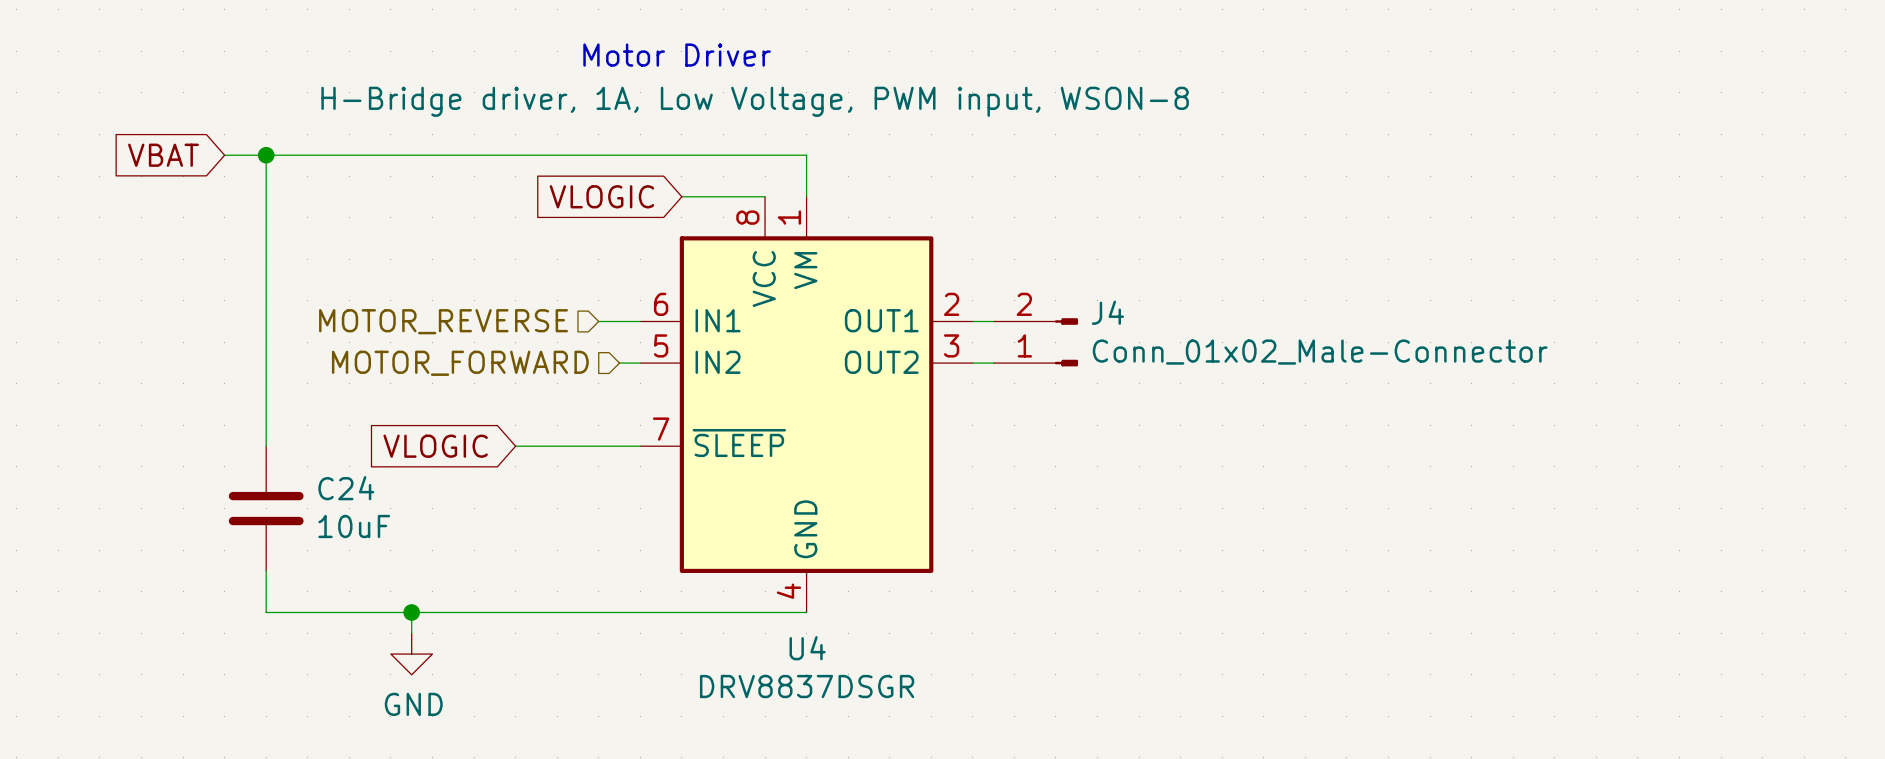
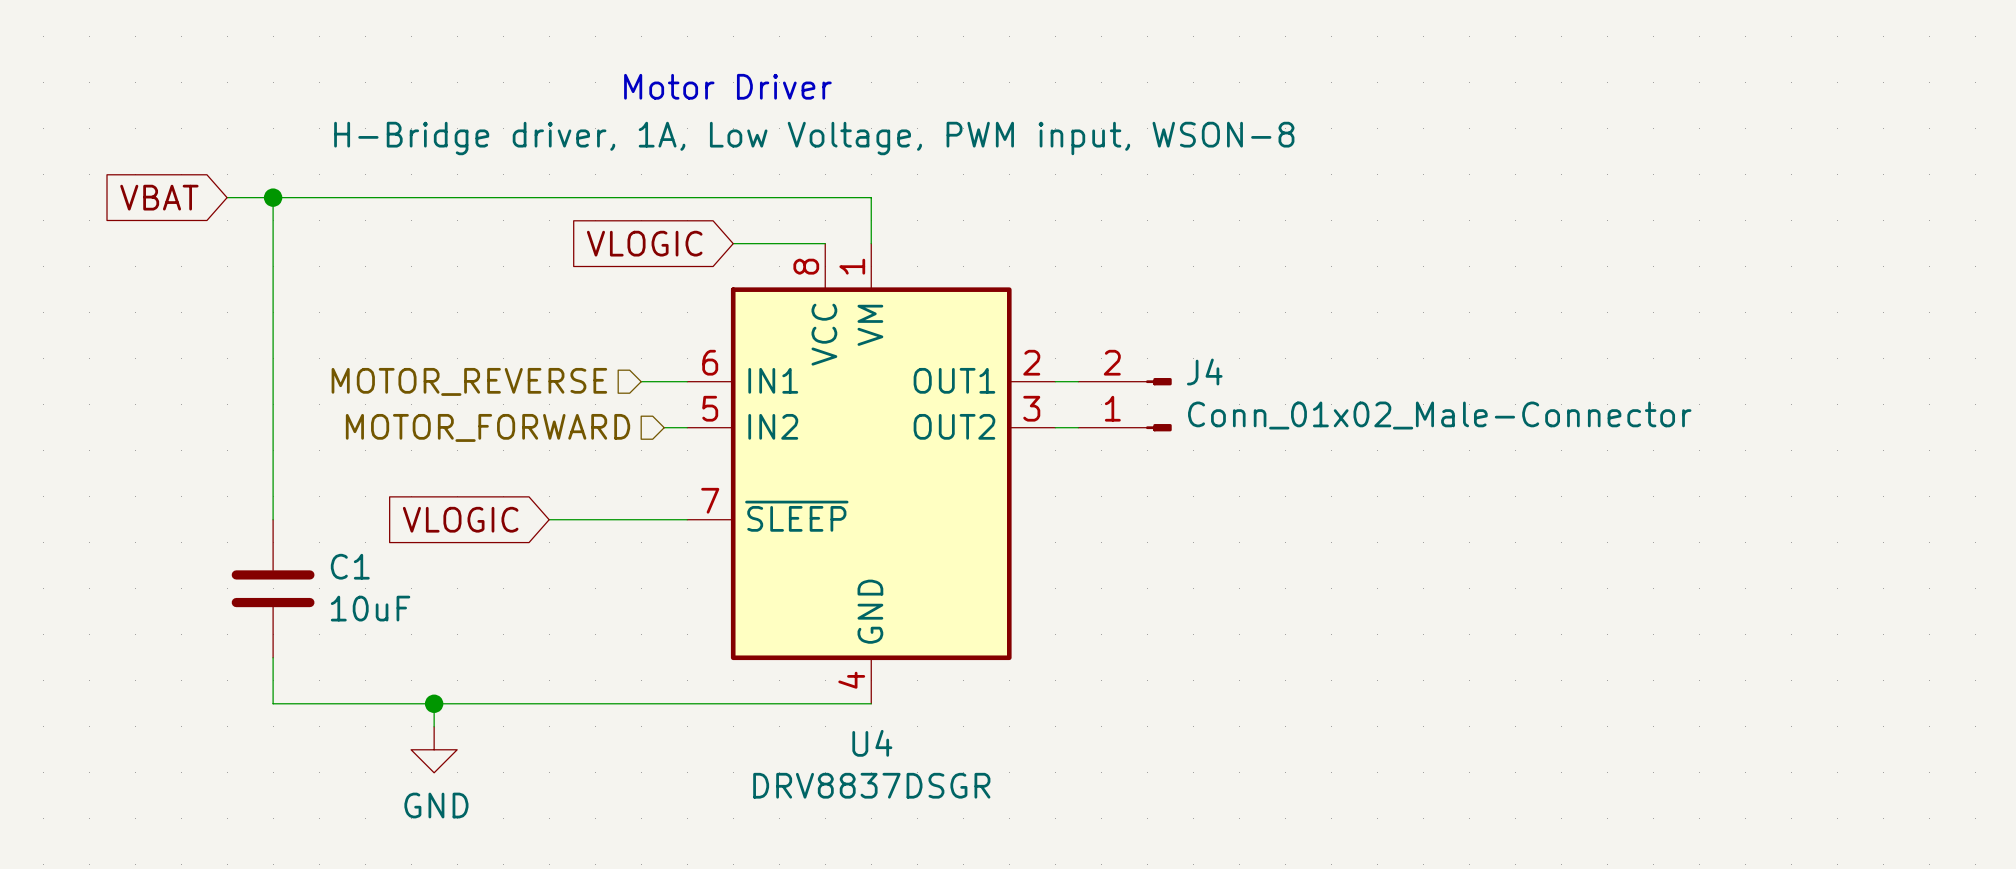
C24 name: C24 (346, 488) -> C1 (350, 566)

